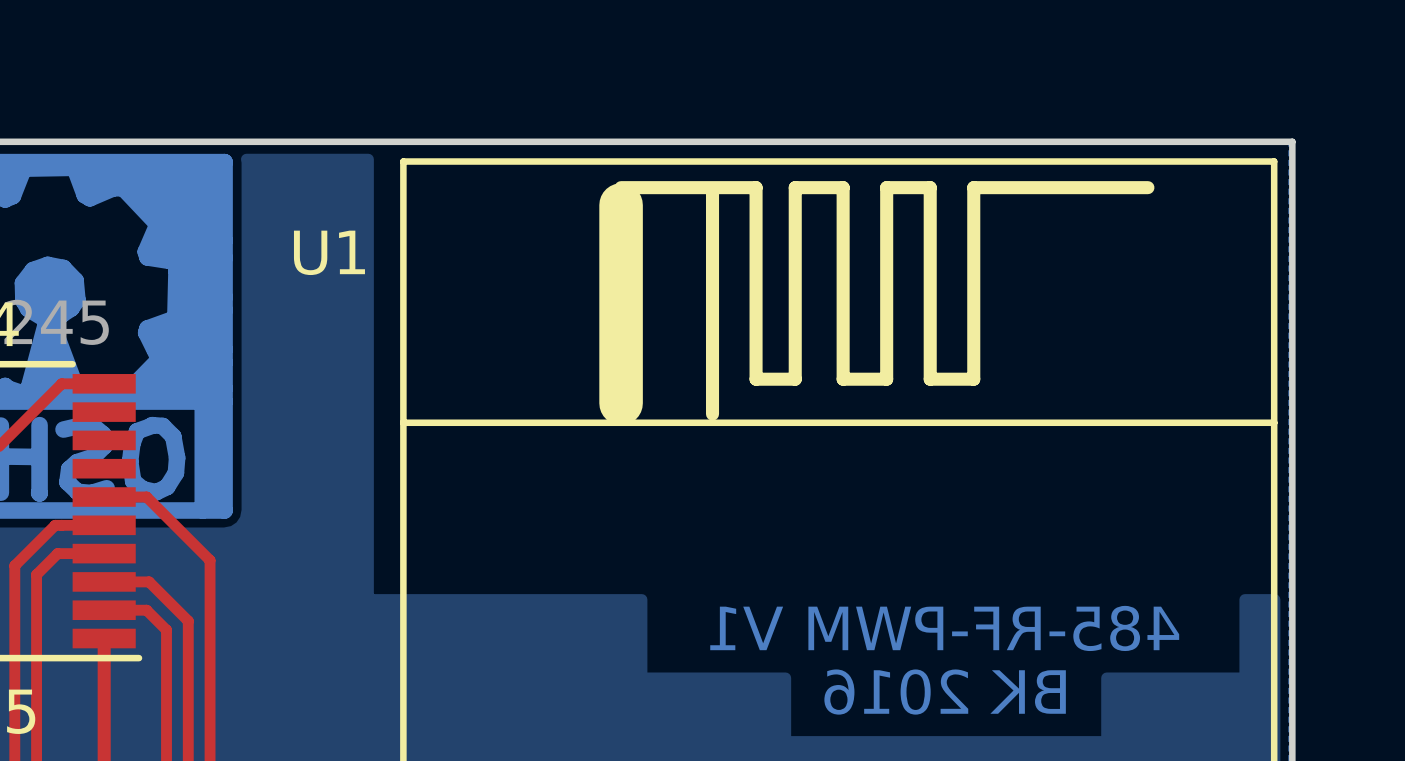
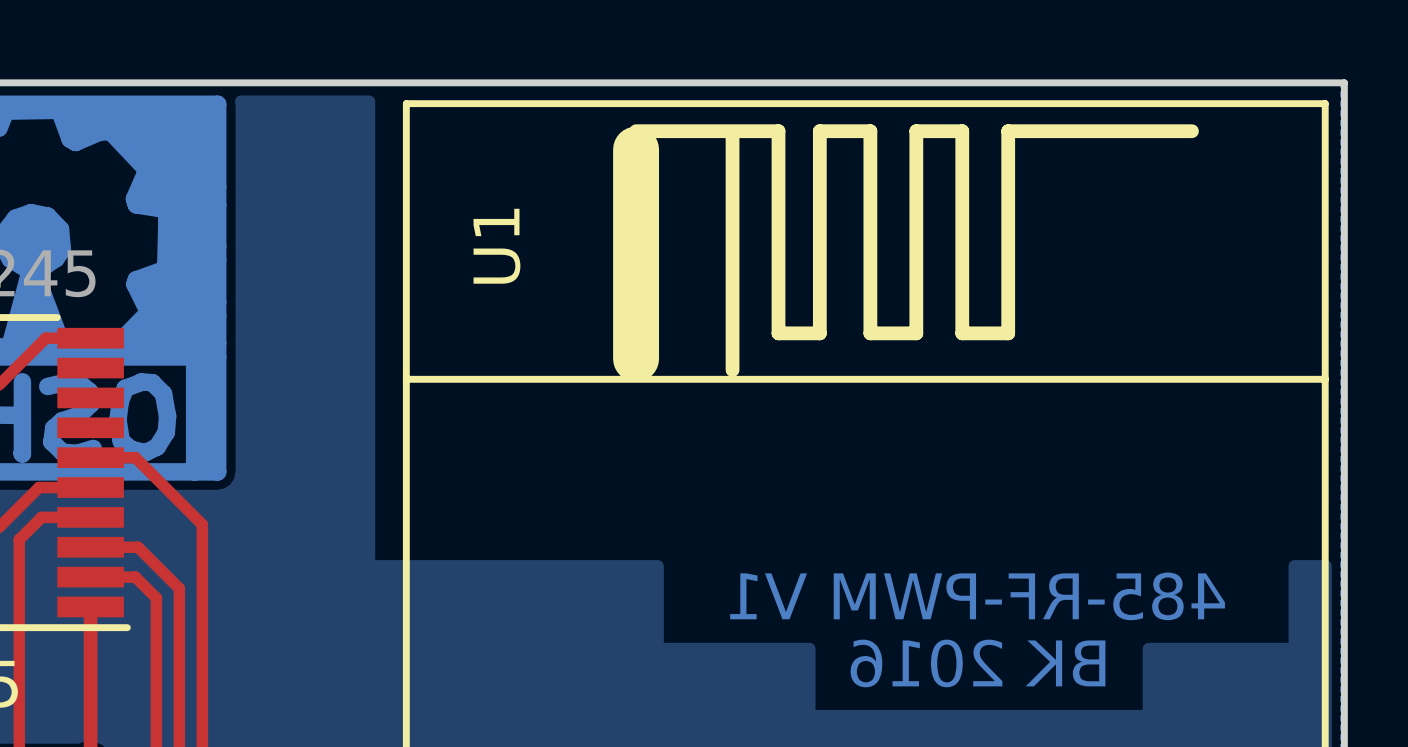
U1 name rotation: 0° (329, 252) -> 90° counterclockwise (496, 246)
U1 name position: U1 (329, 252) -> U1 (496, 246)

